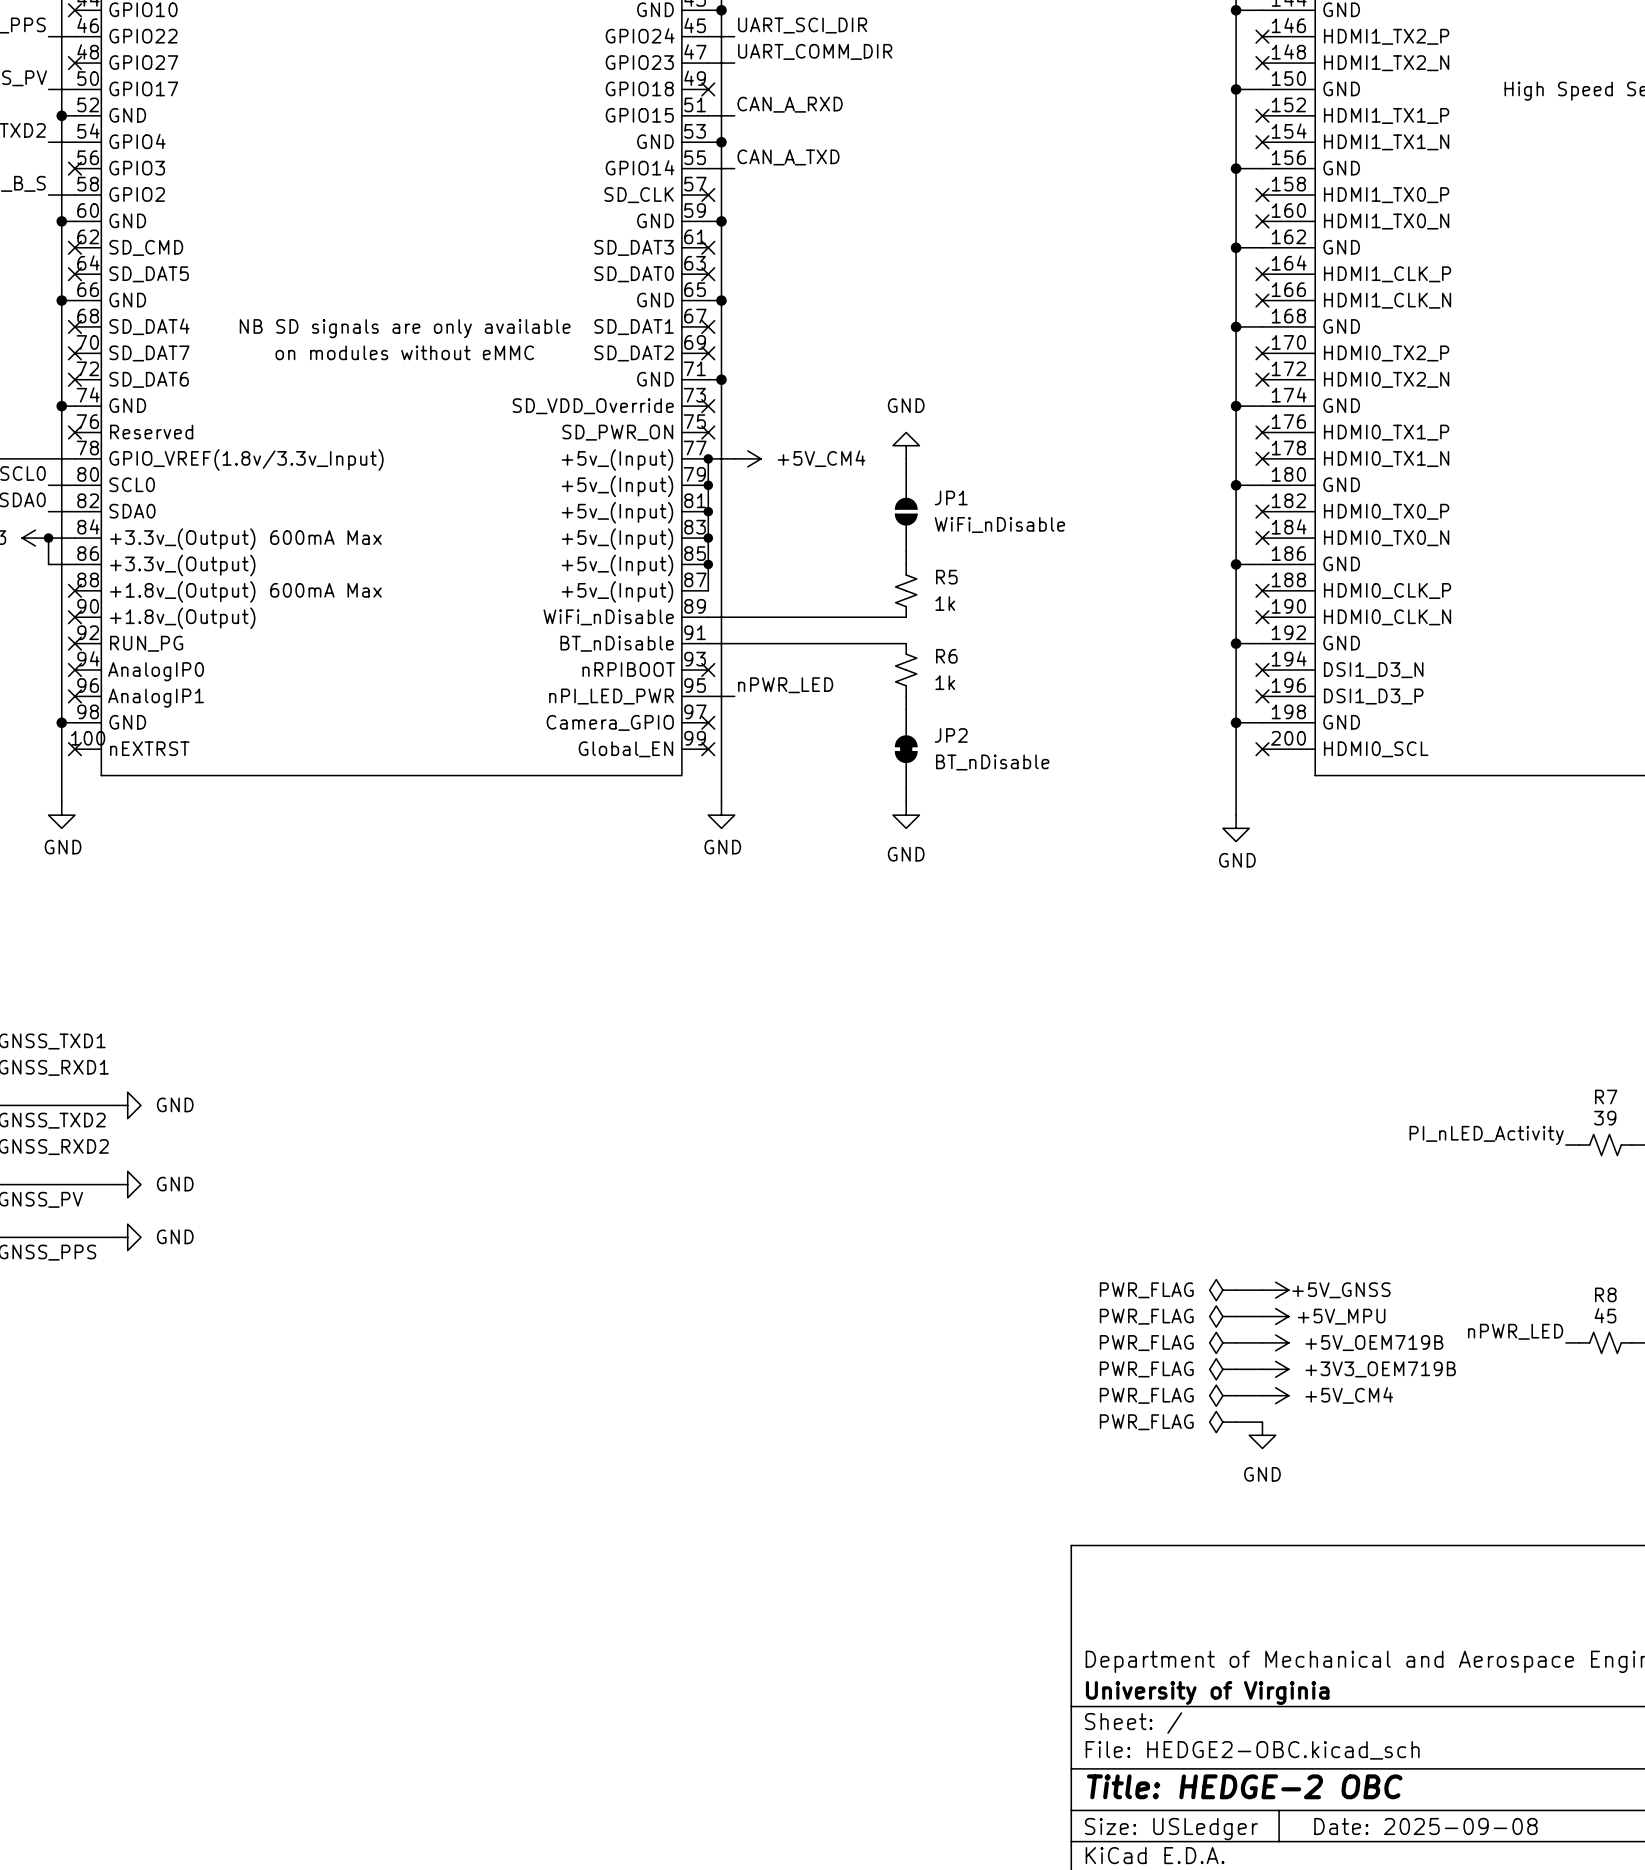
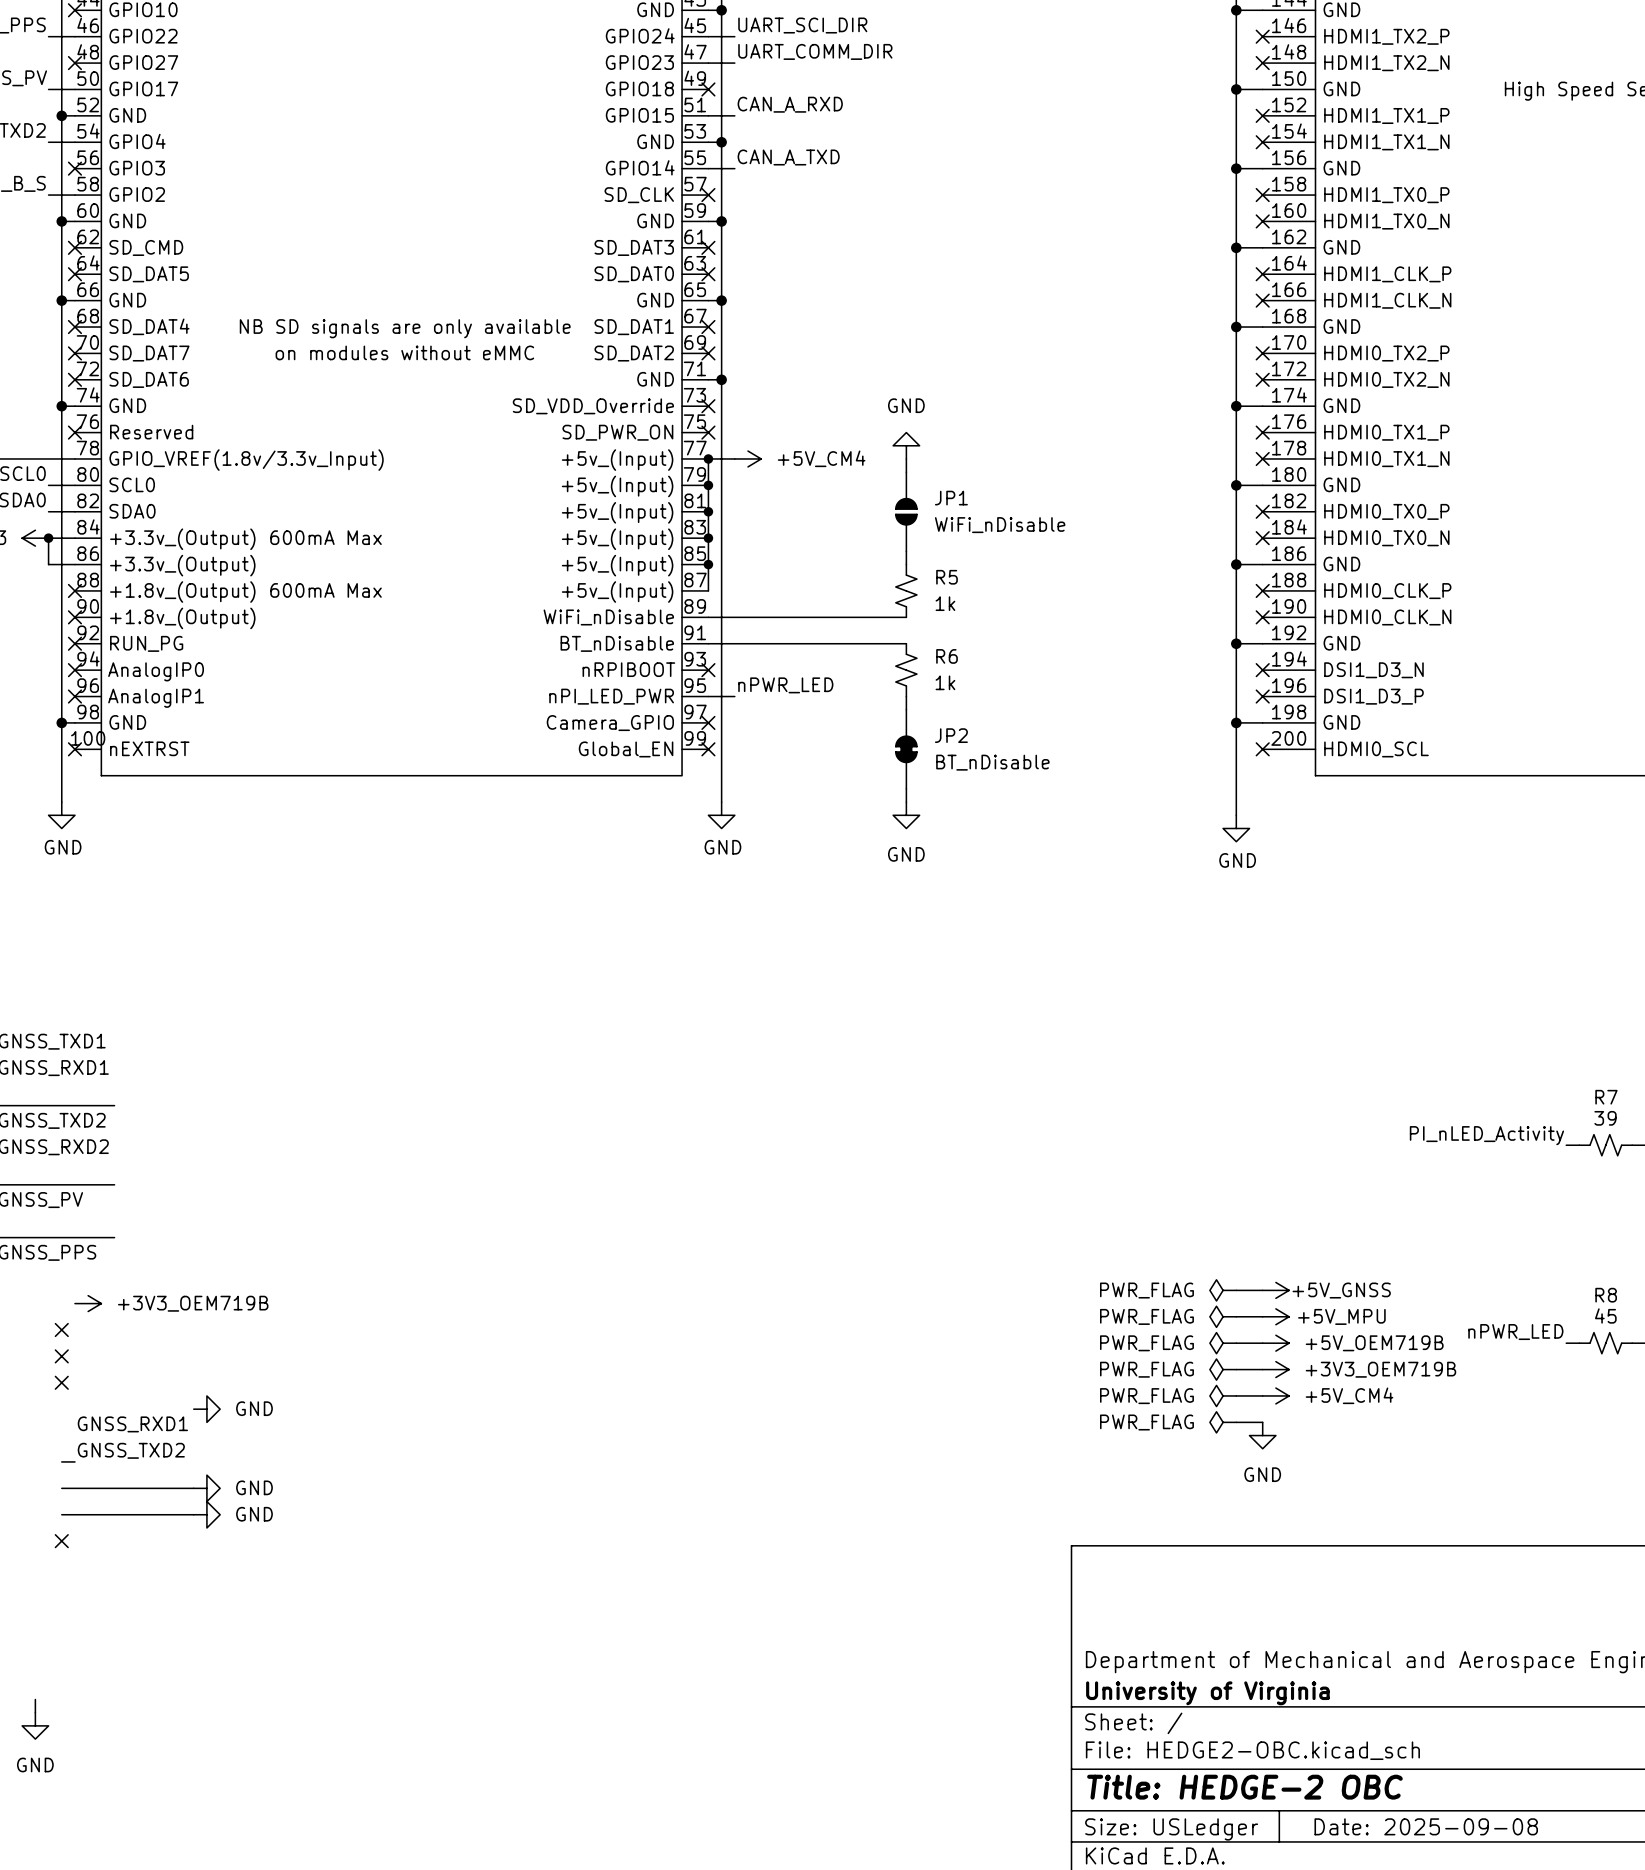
power symbol: GND (127, 1105) -> none
power symbol: GND (127, 1184) -> none
power symbol: GND (127, 1237) -> none
power symbol: none -> +3V3_OEM719B (88, 1303)
no-connect mark: none -> (61, 1329)
no-connect mark: none -> (61, 1356)
no-connect mark: none -> (61, 1382)
power symbol: none -> GND (206, 1409)
label: none -> GNSS_RXD1 (132, 1424)
label: none -> GNSS_TXD2 (131, 1450)
wire: none -> (61, 1461) (74, 1461)
wire: none -> (61, 1488) (193, 1488)
power symbol: none -> GND (206, 1488)
wire: none -> (61, 1514) (193, 1514)
power symbol: none -> GND (206, 1514)
no-connect mark: none -> (61, 1541)
wire: none -> (35, 1699) (35, 1712)
power symbol: none -> GND (35, 1725)

